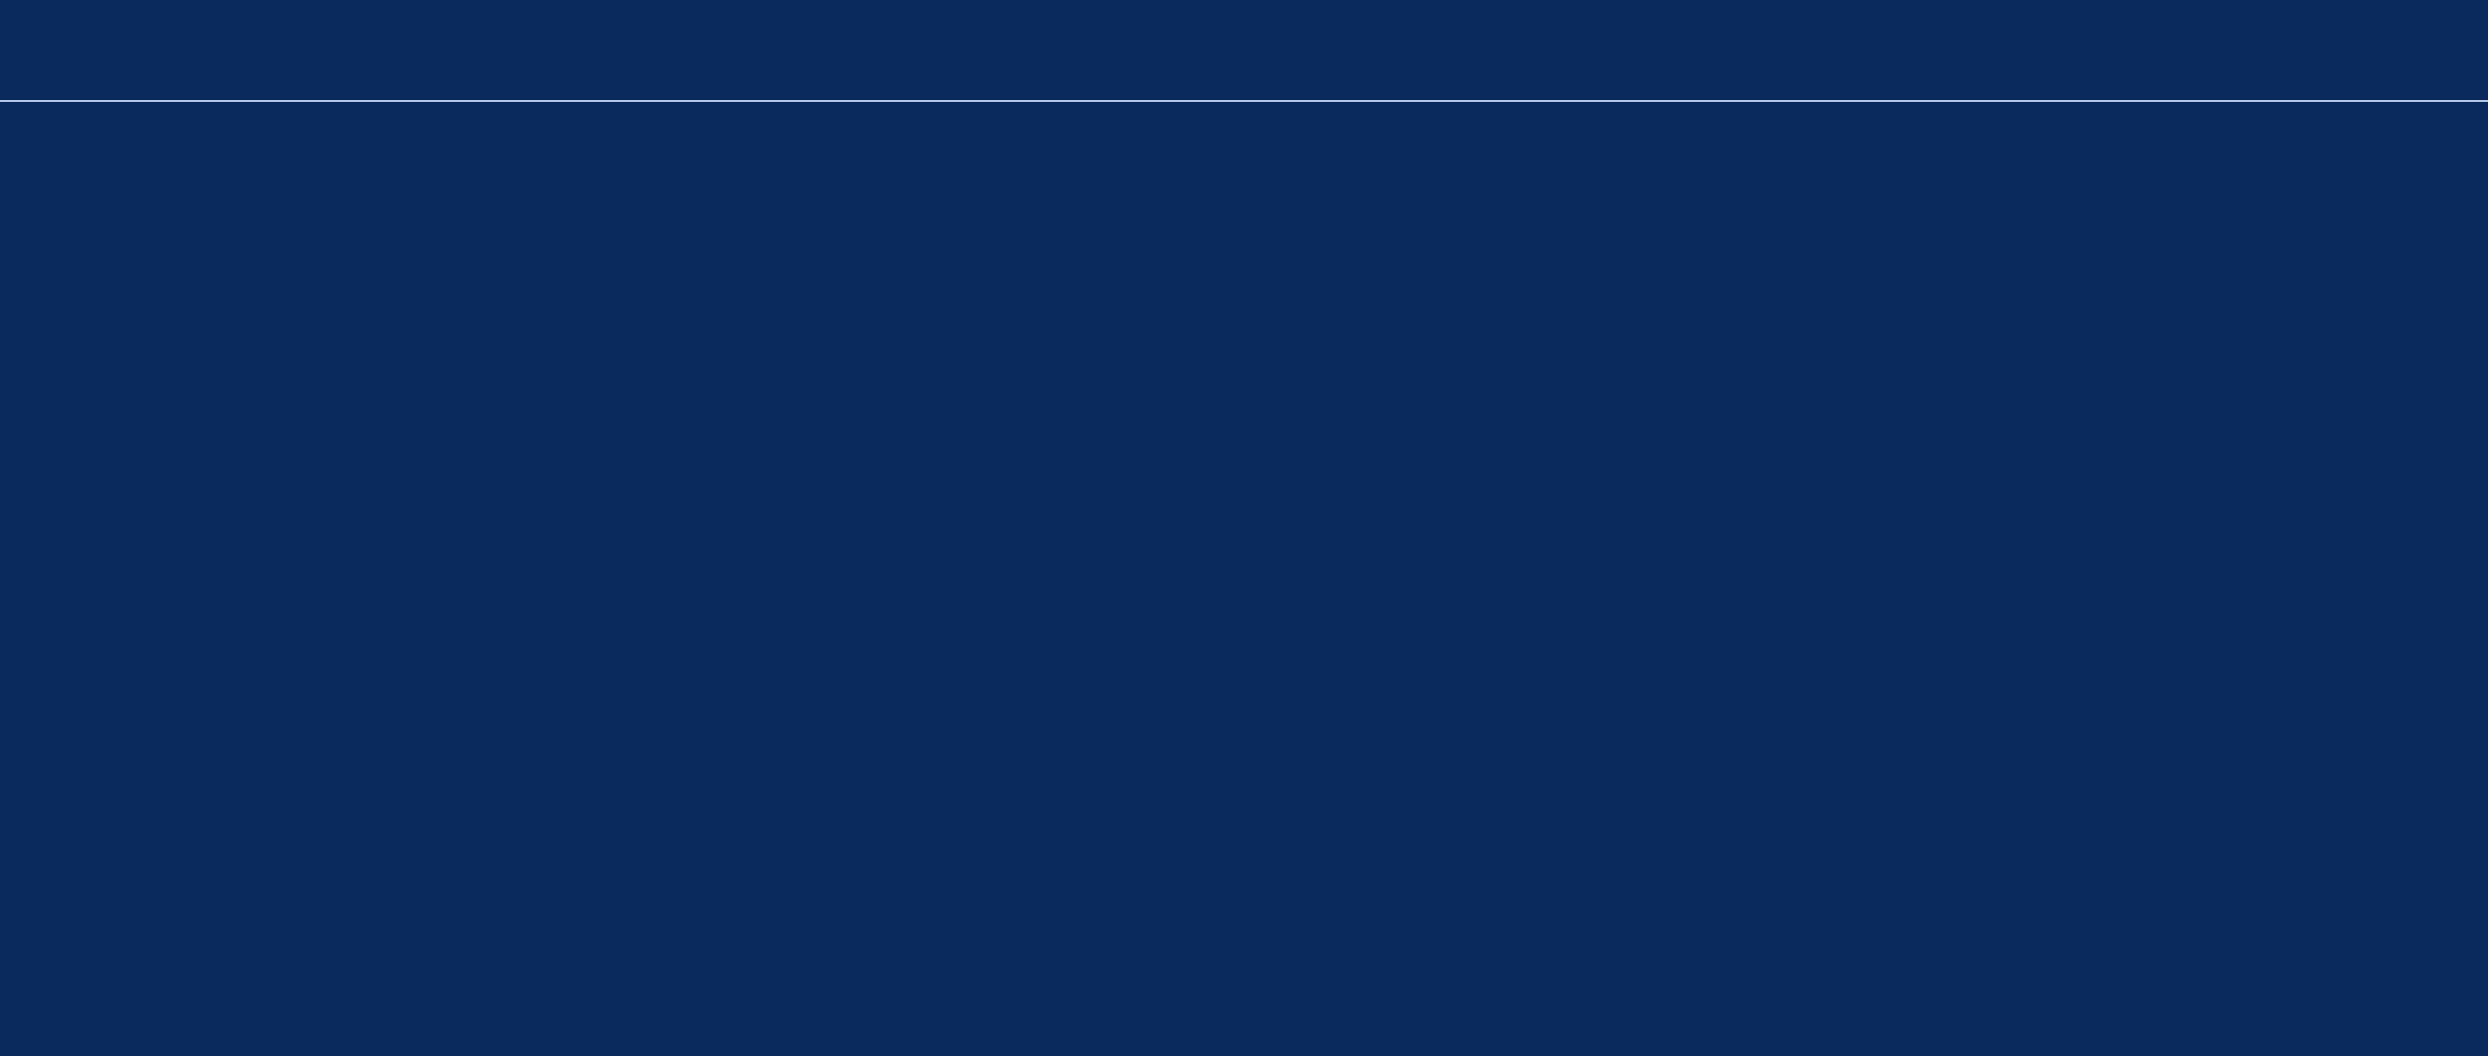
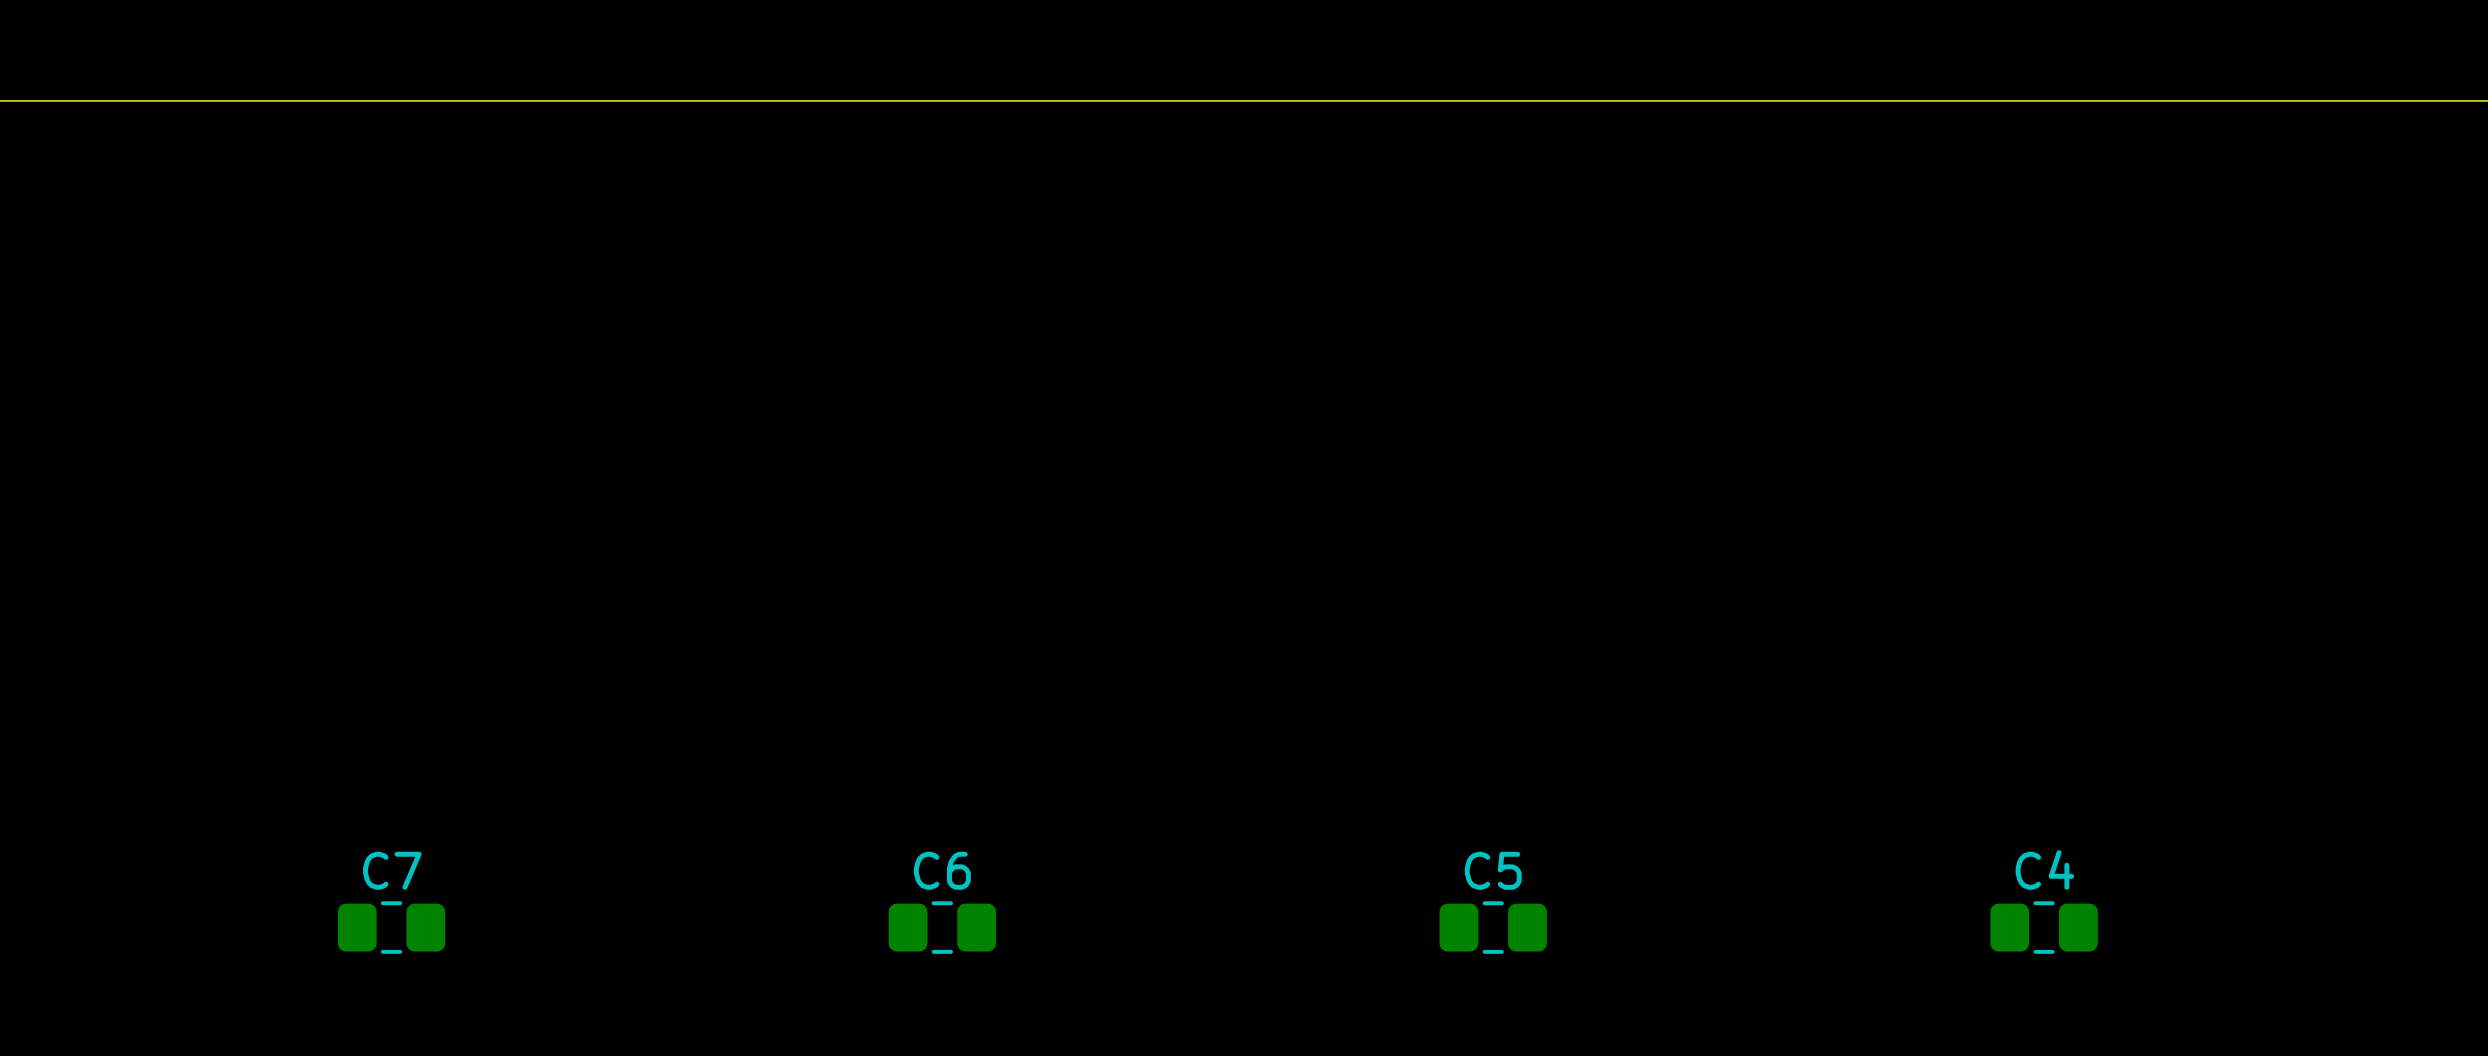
C7: none -> (391, 927)
C6: none -> (942, 927)
C5: none -> (1493, 927)
C4: none -> (2044, 927)

